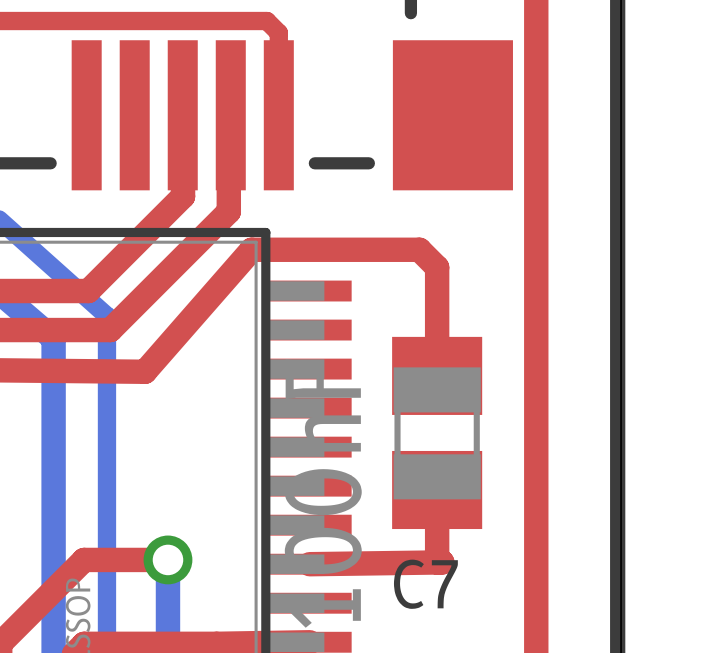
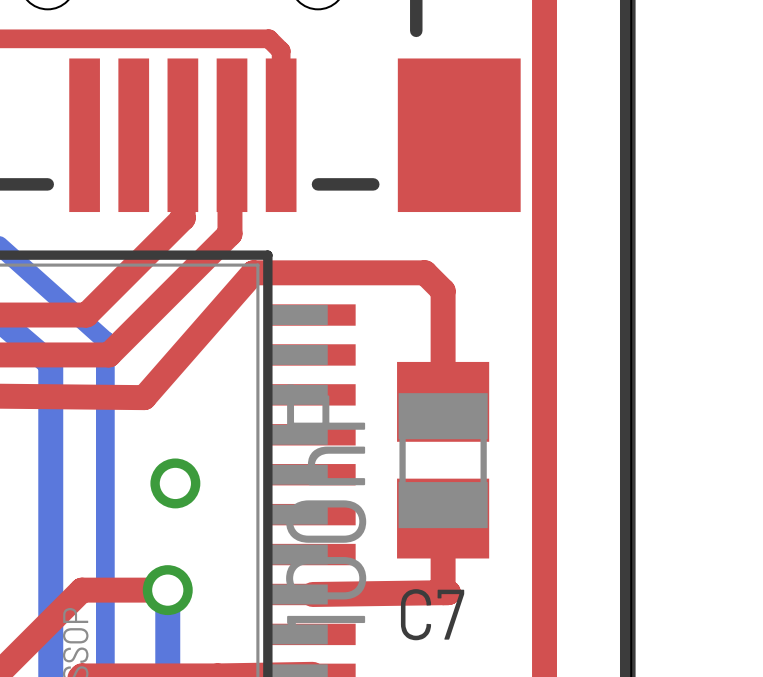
via: none -> (175, 483)

